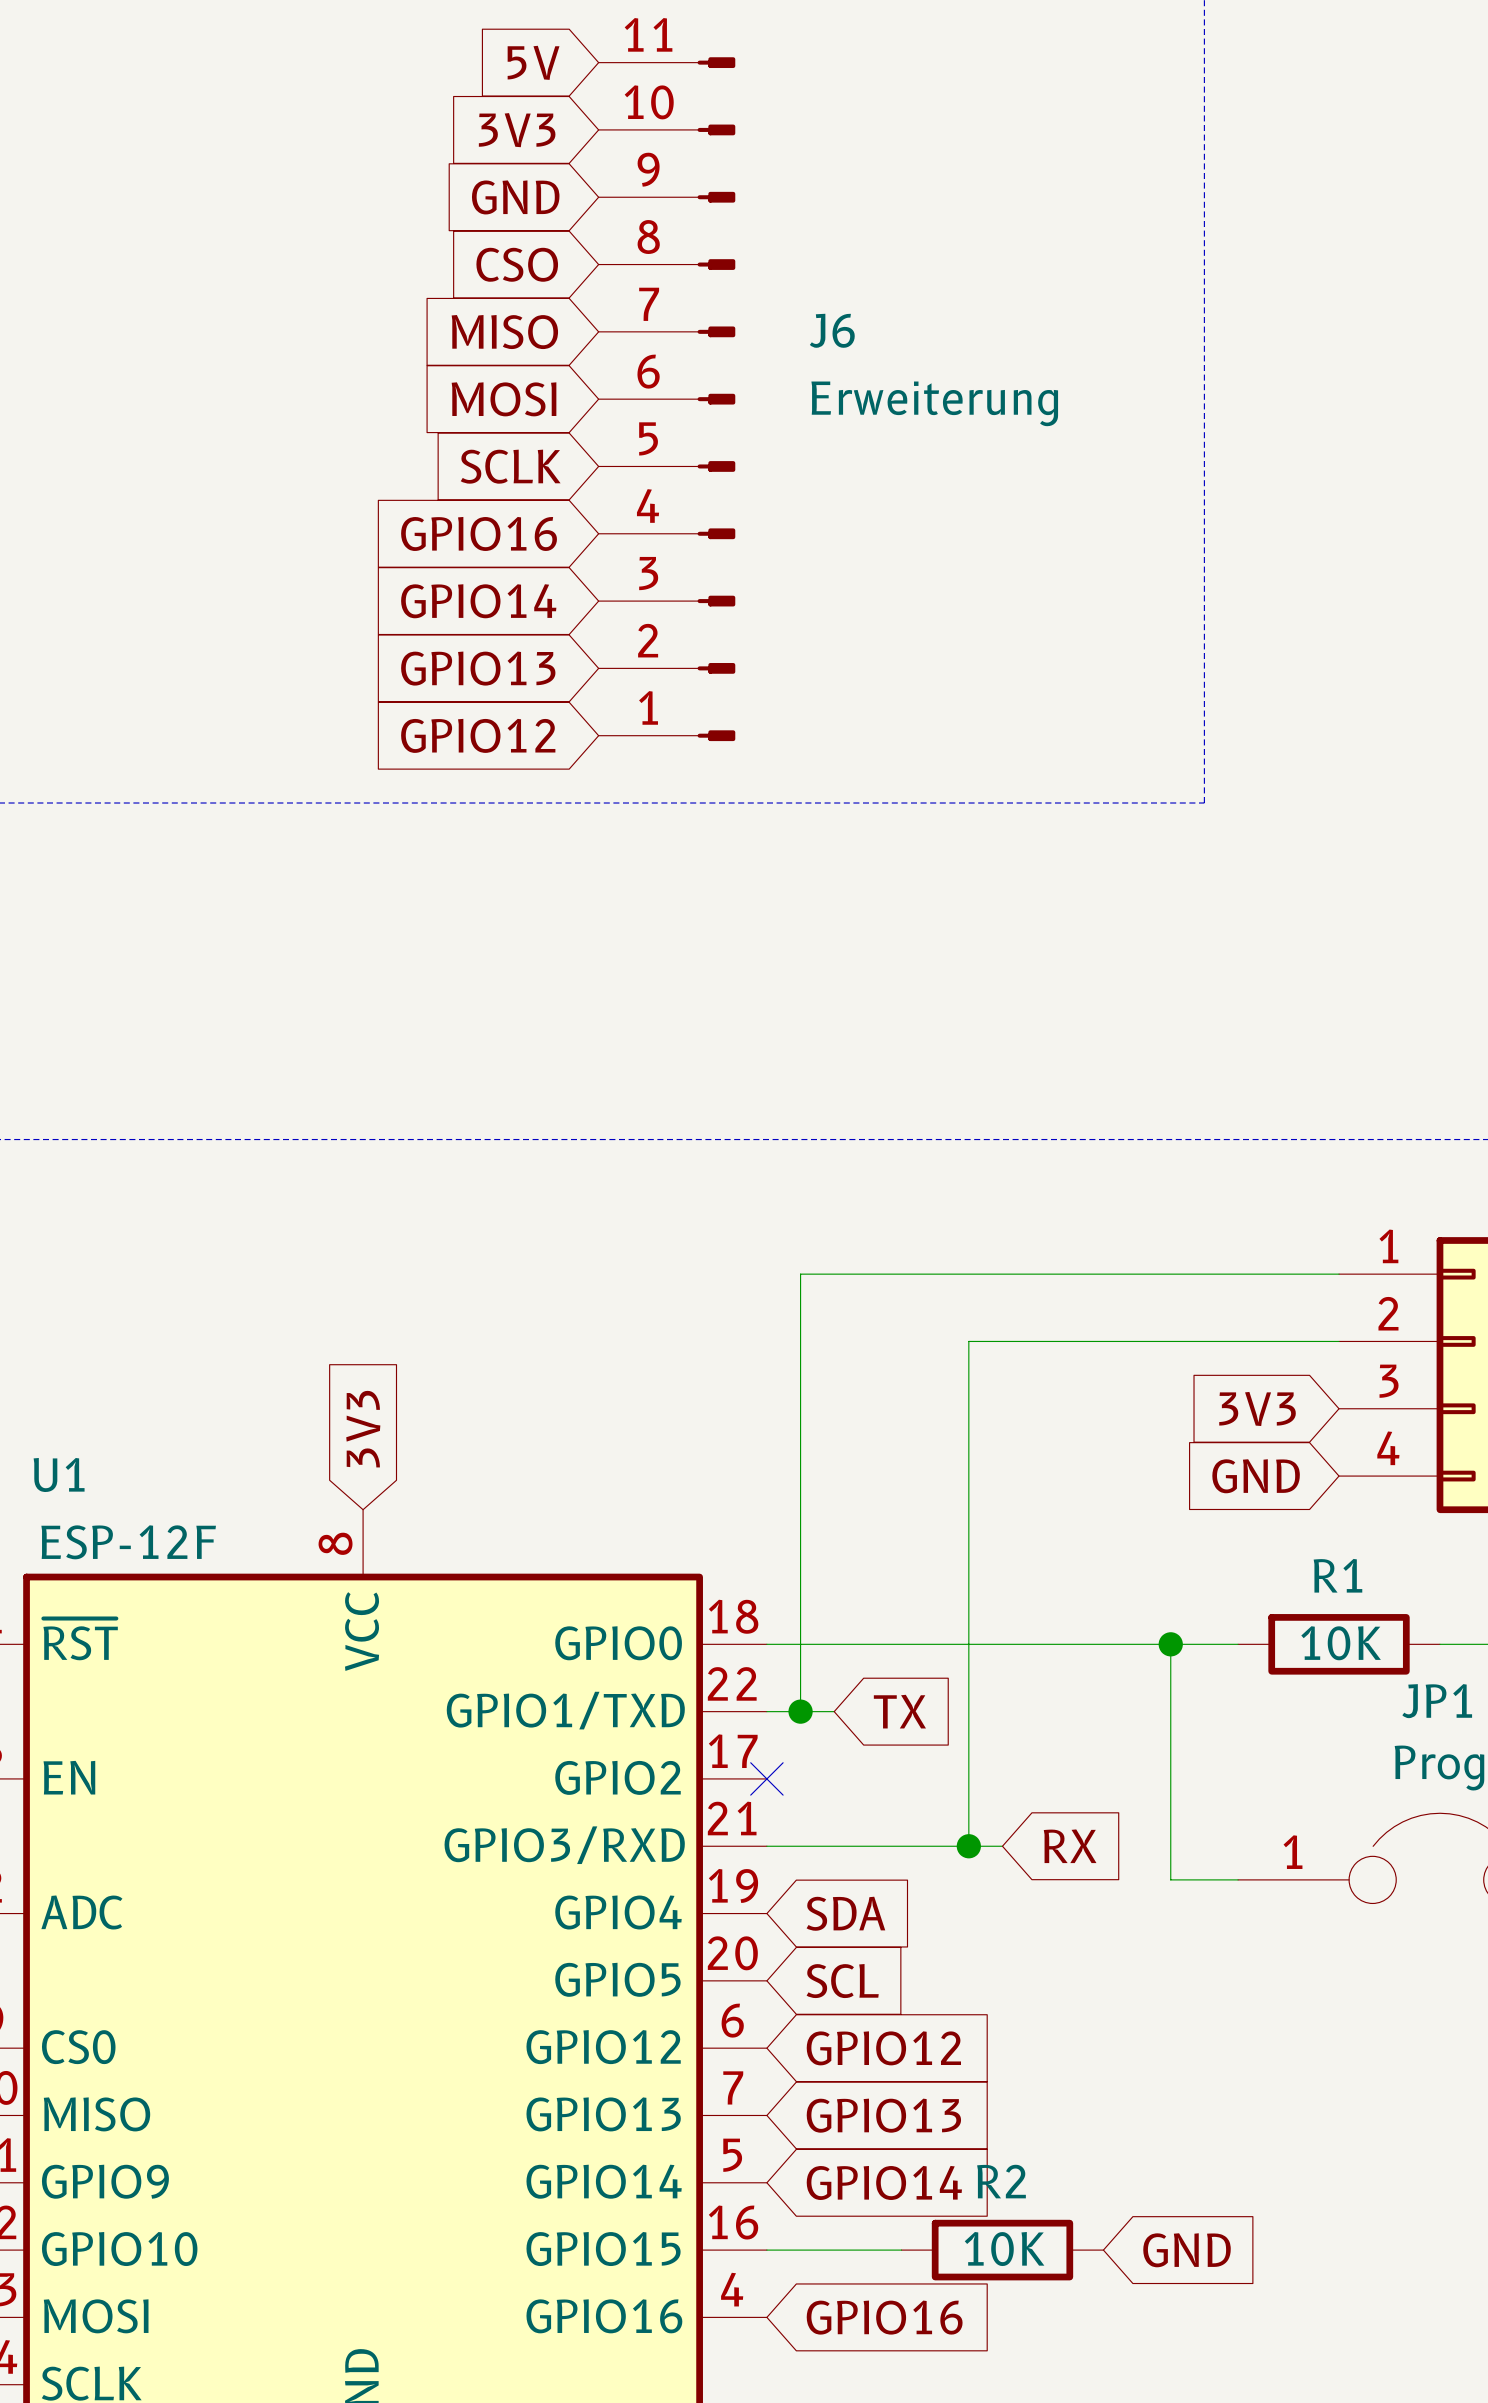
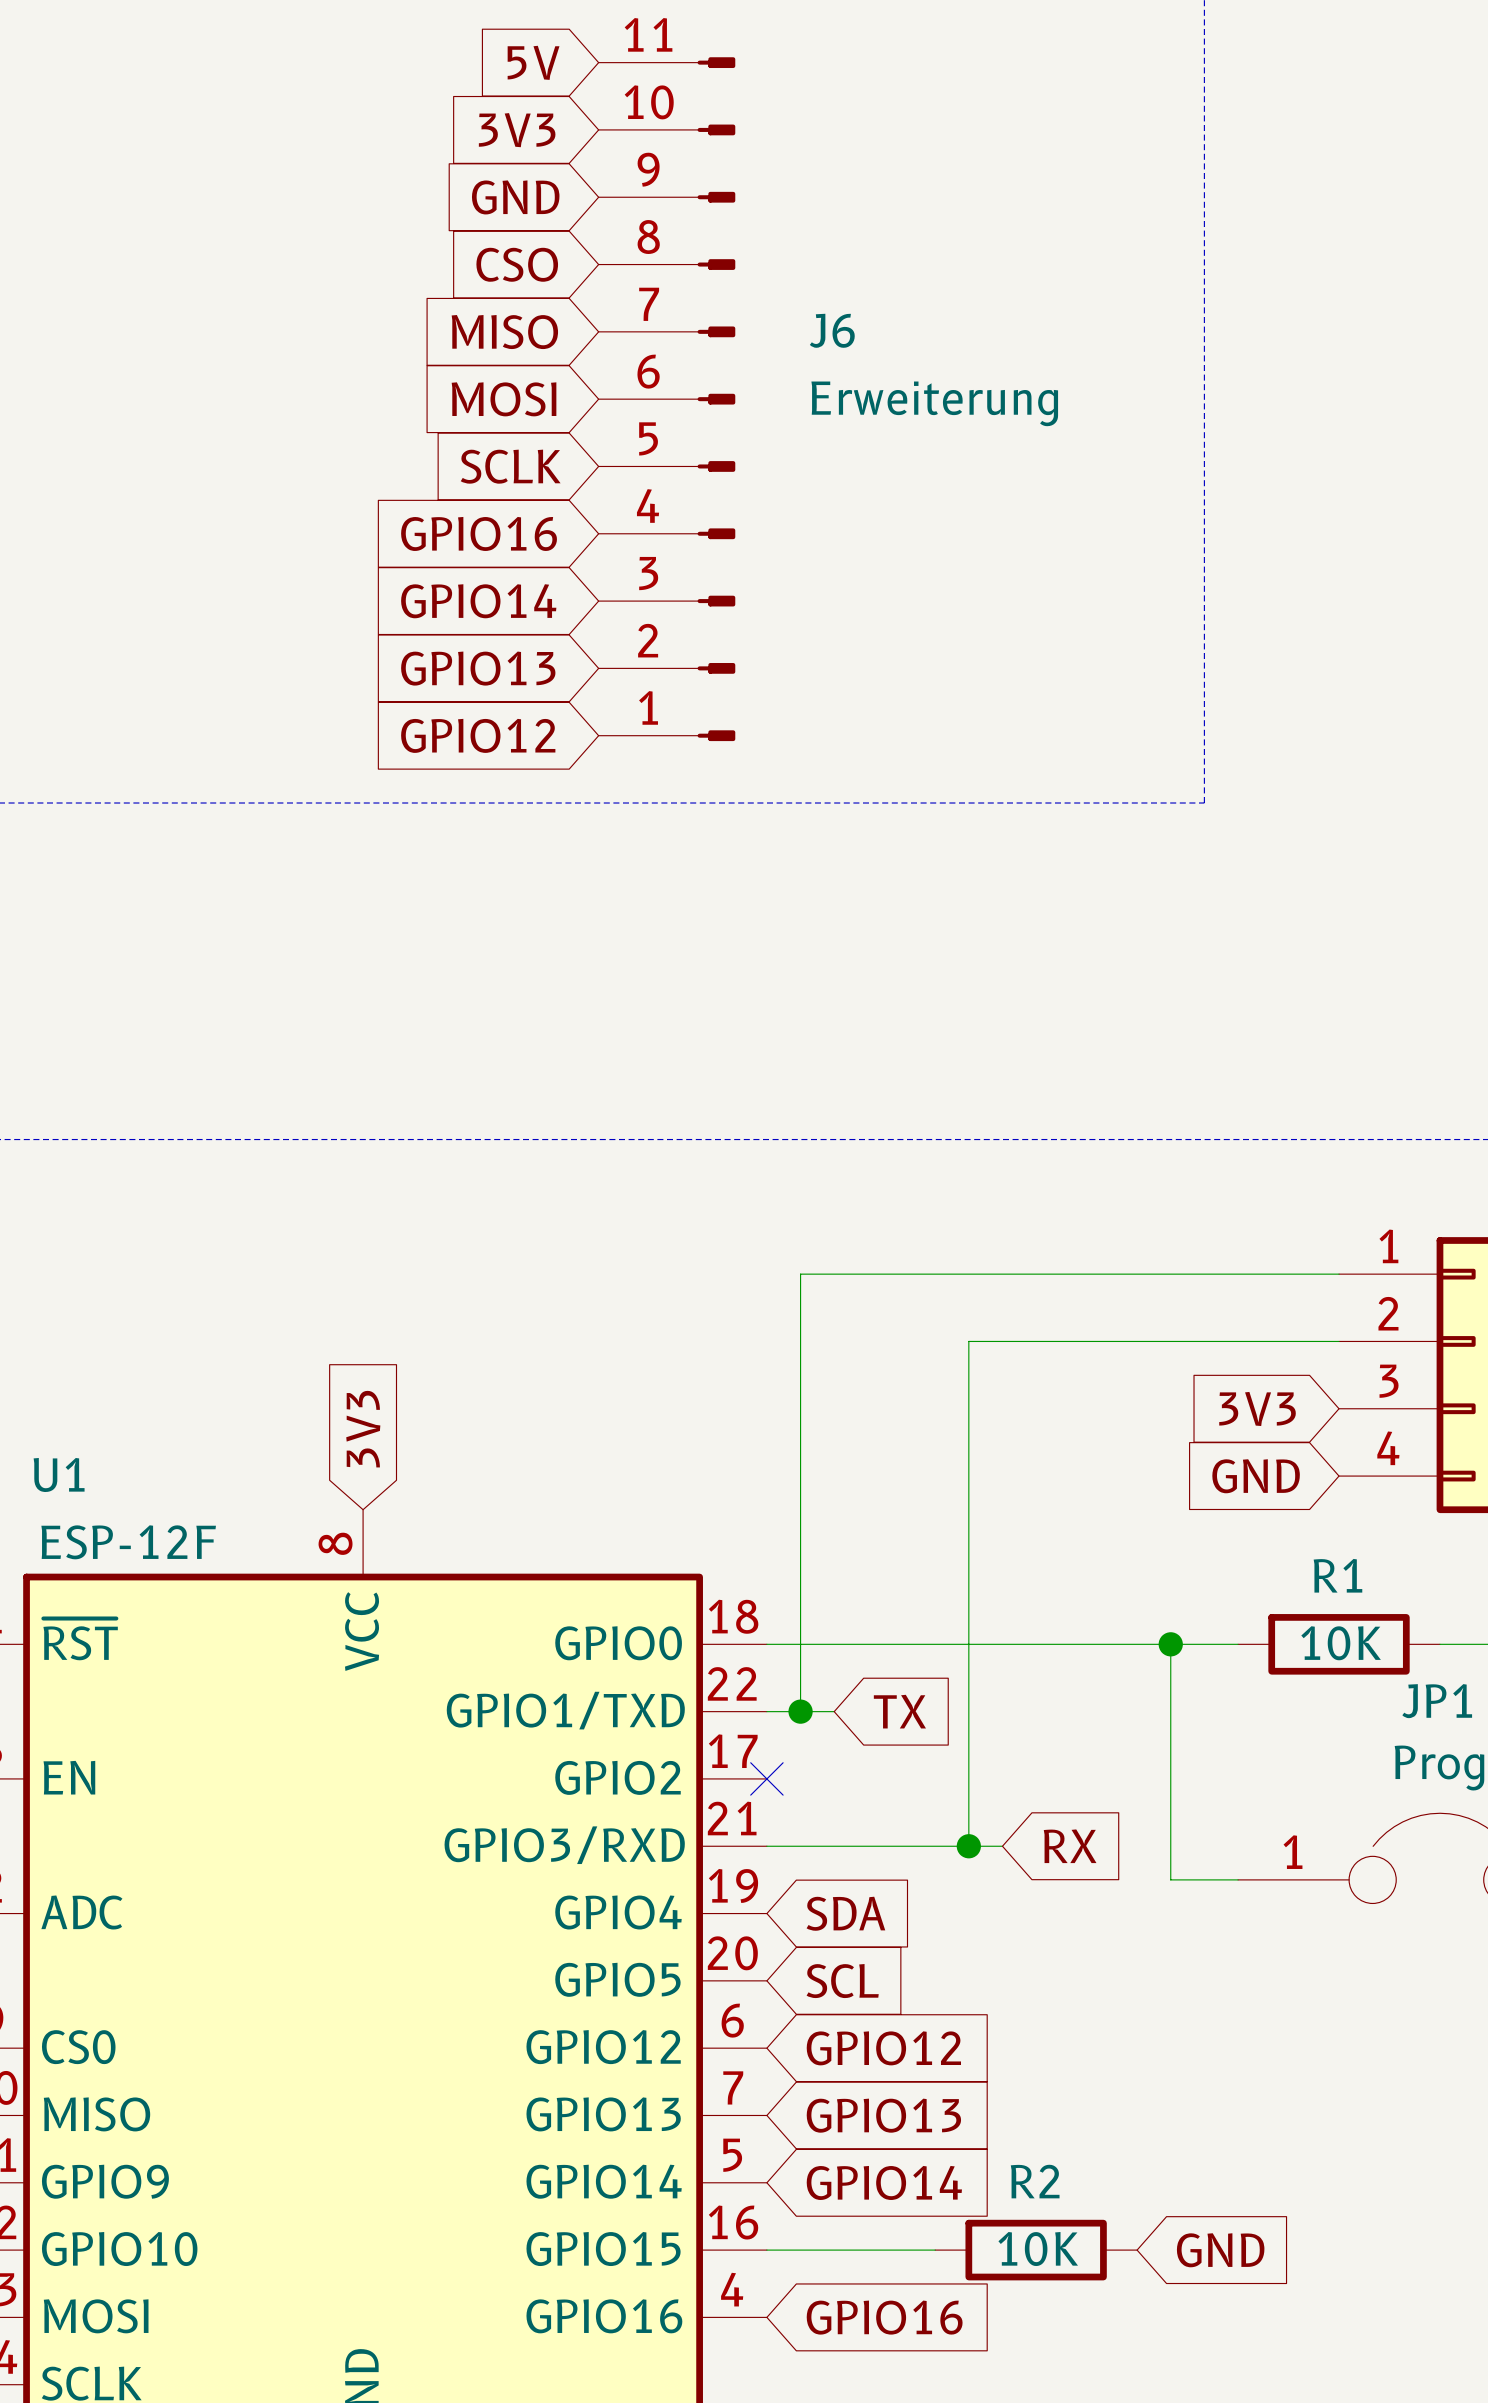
R2 position: (1002, 2250) -> (1036, 2250)
global label position: GND (1187, 2250) -> GND (1220, 2250)

